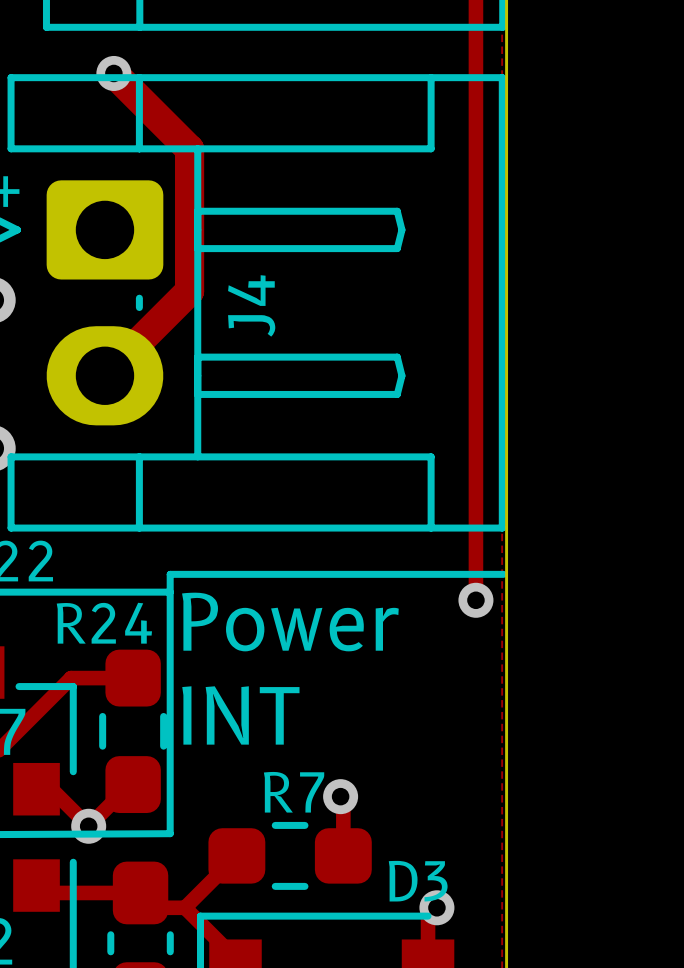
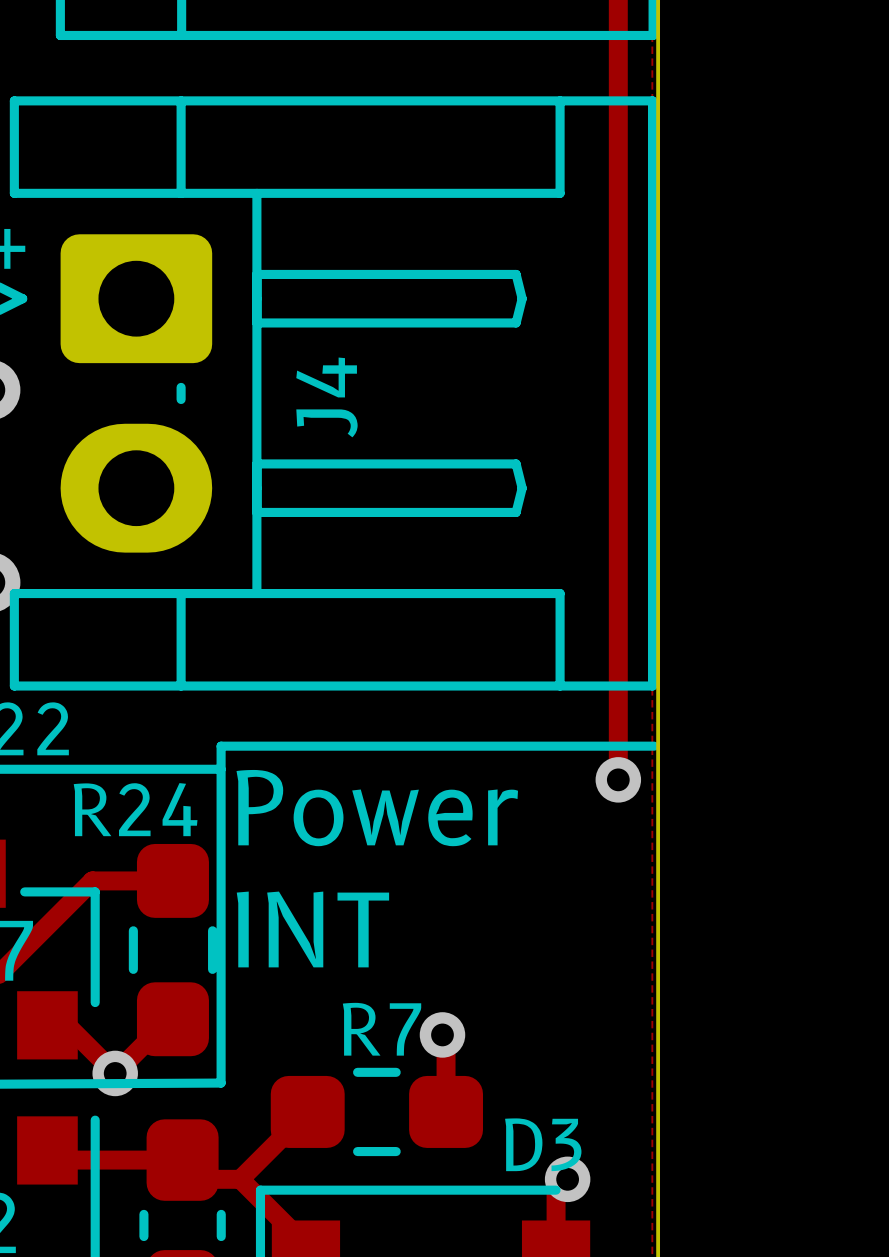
track: (113, 73) (189, 149) (189, 291) (104, 375) -> none
via: (113, 73) -> none

